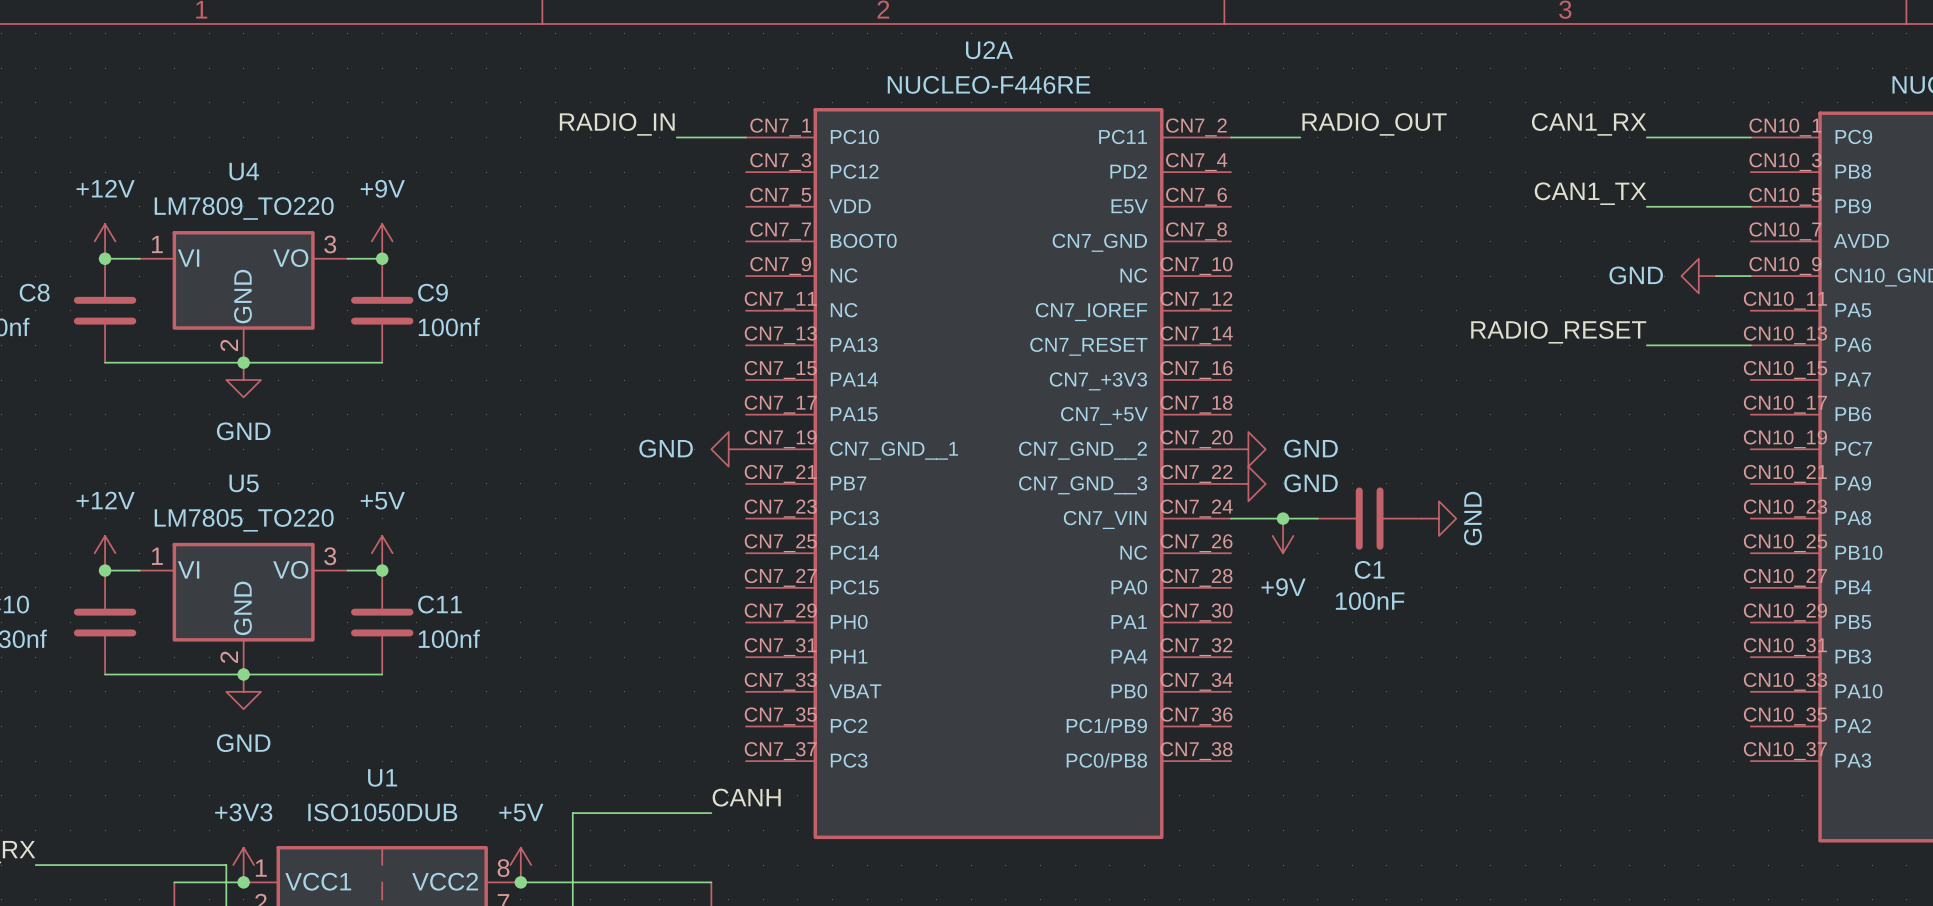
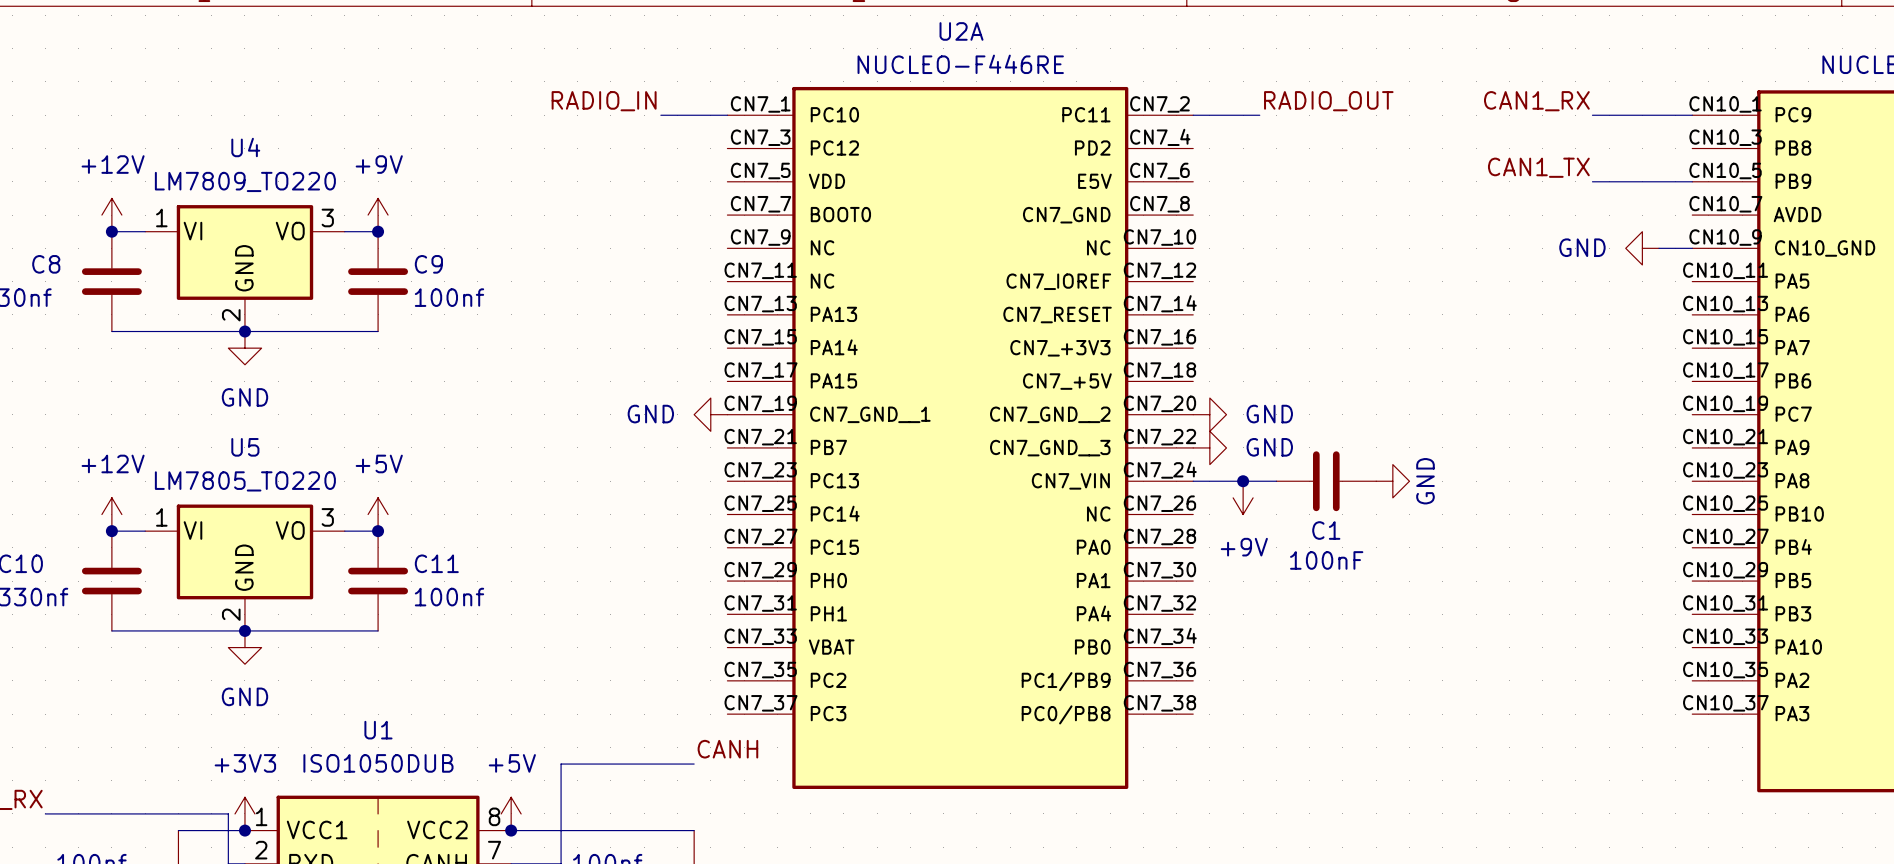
label: RADIO_RESET (1558, 332) -> none
wire: (1646, 345) (1750, 345) -> none

